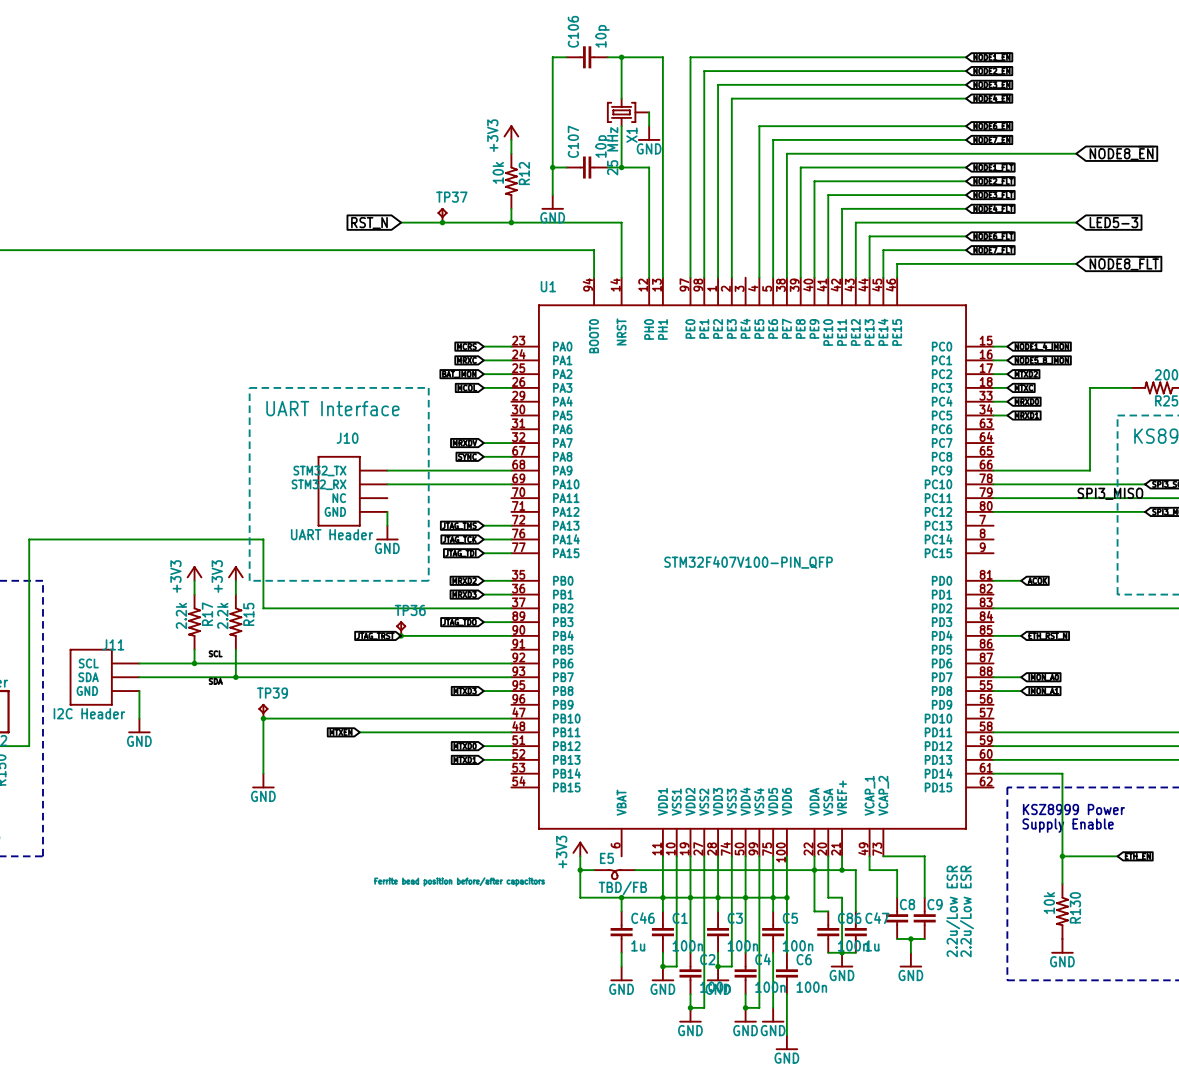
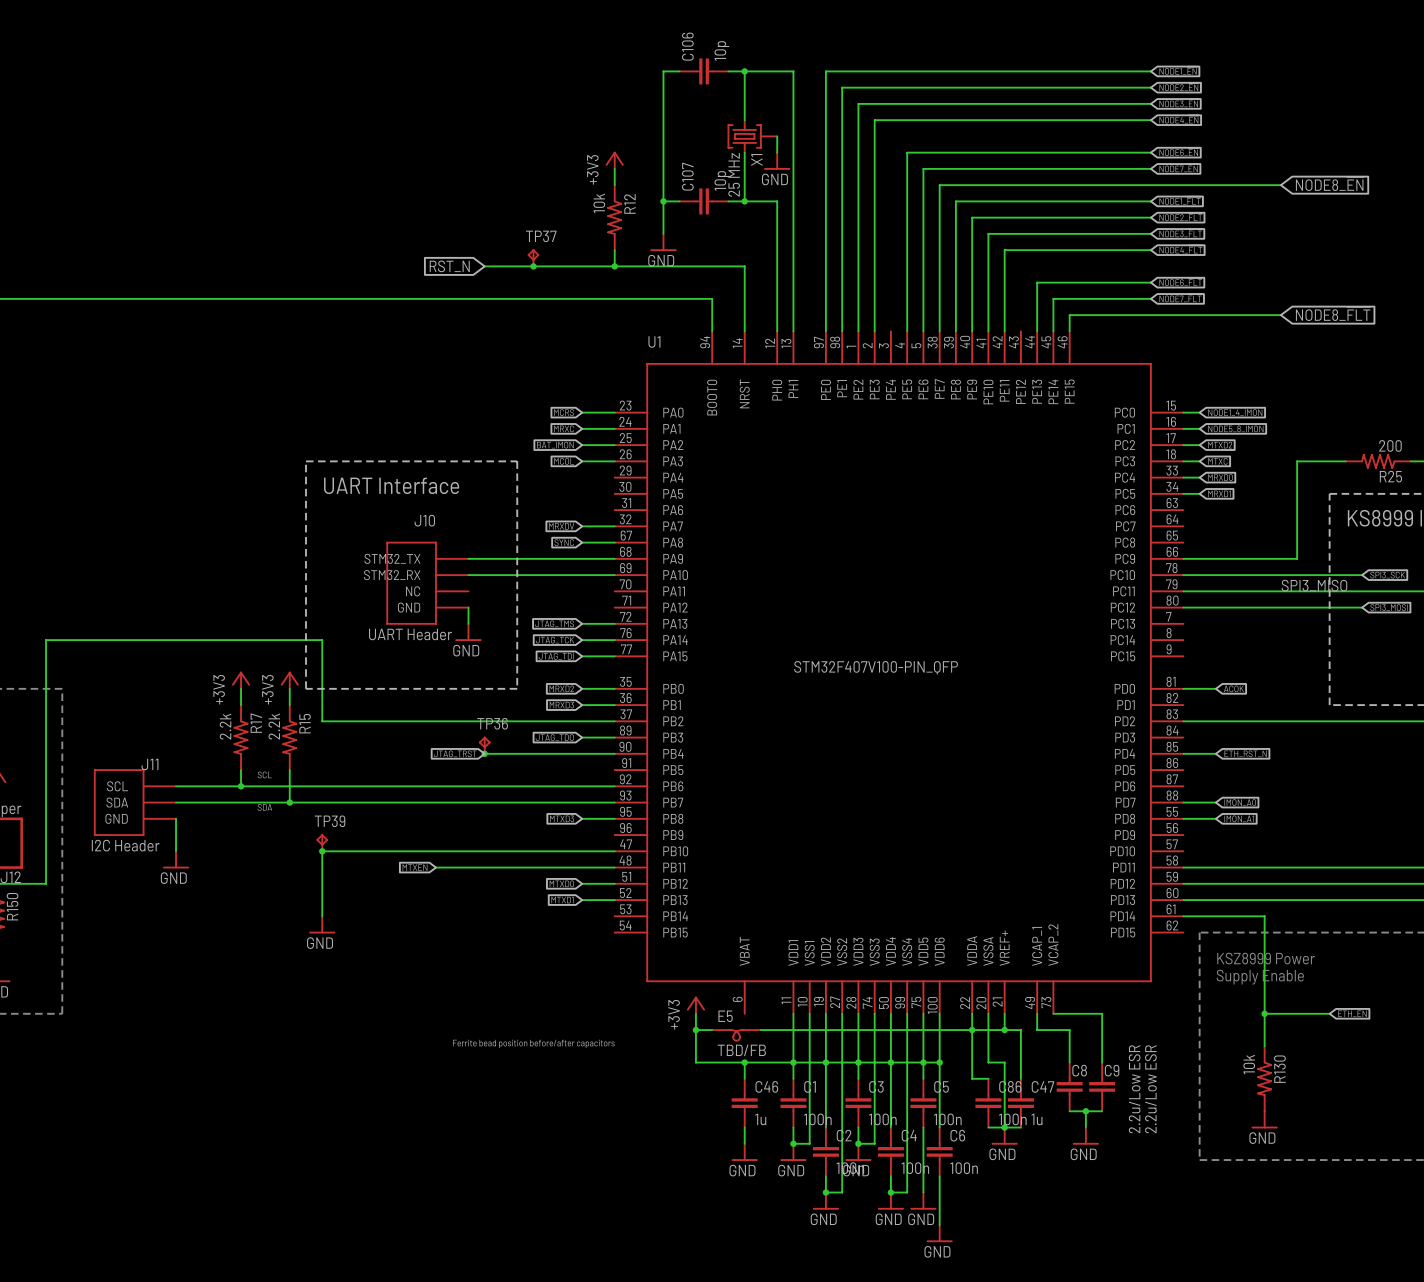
wire: (1076, 222) (855, 222) (855, 277) -> none
global label: LED5-3 (1113, 222) -> none

